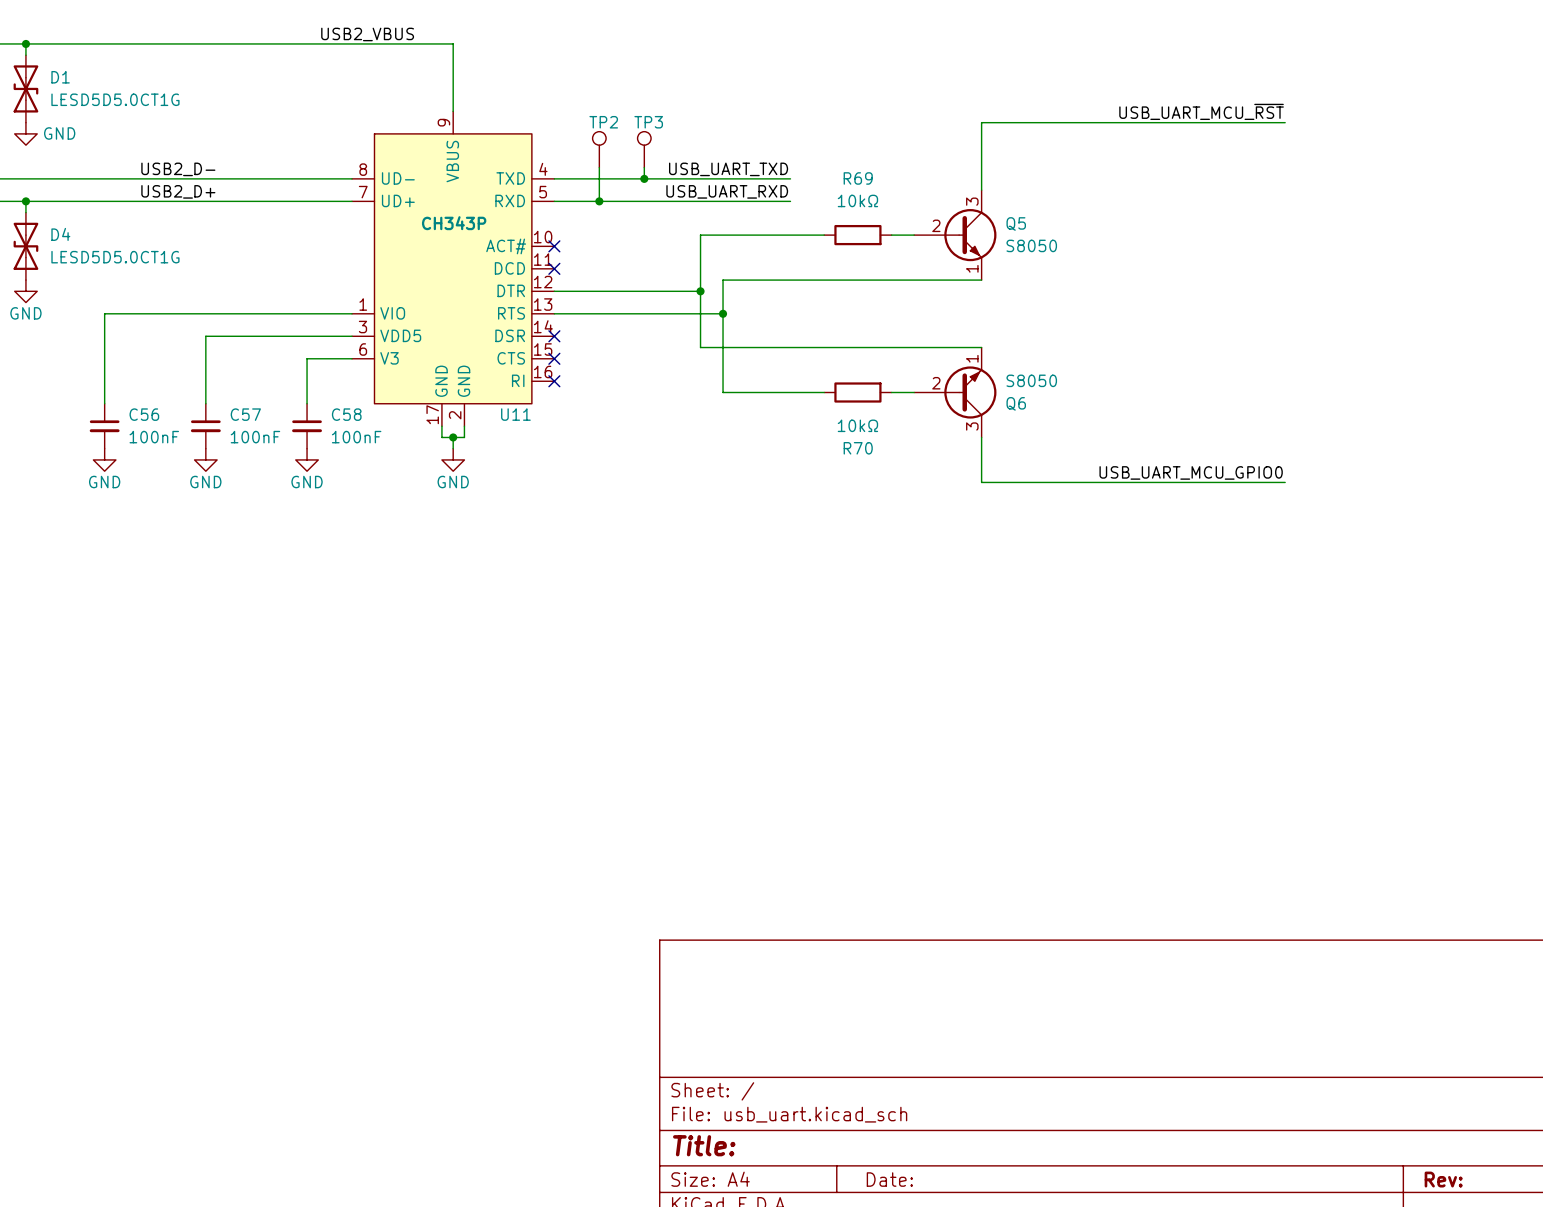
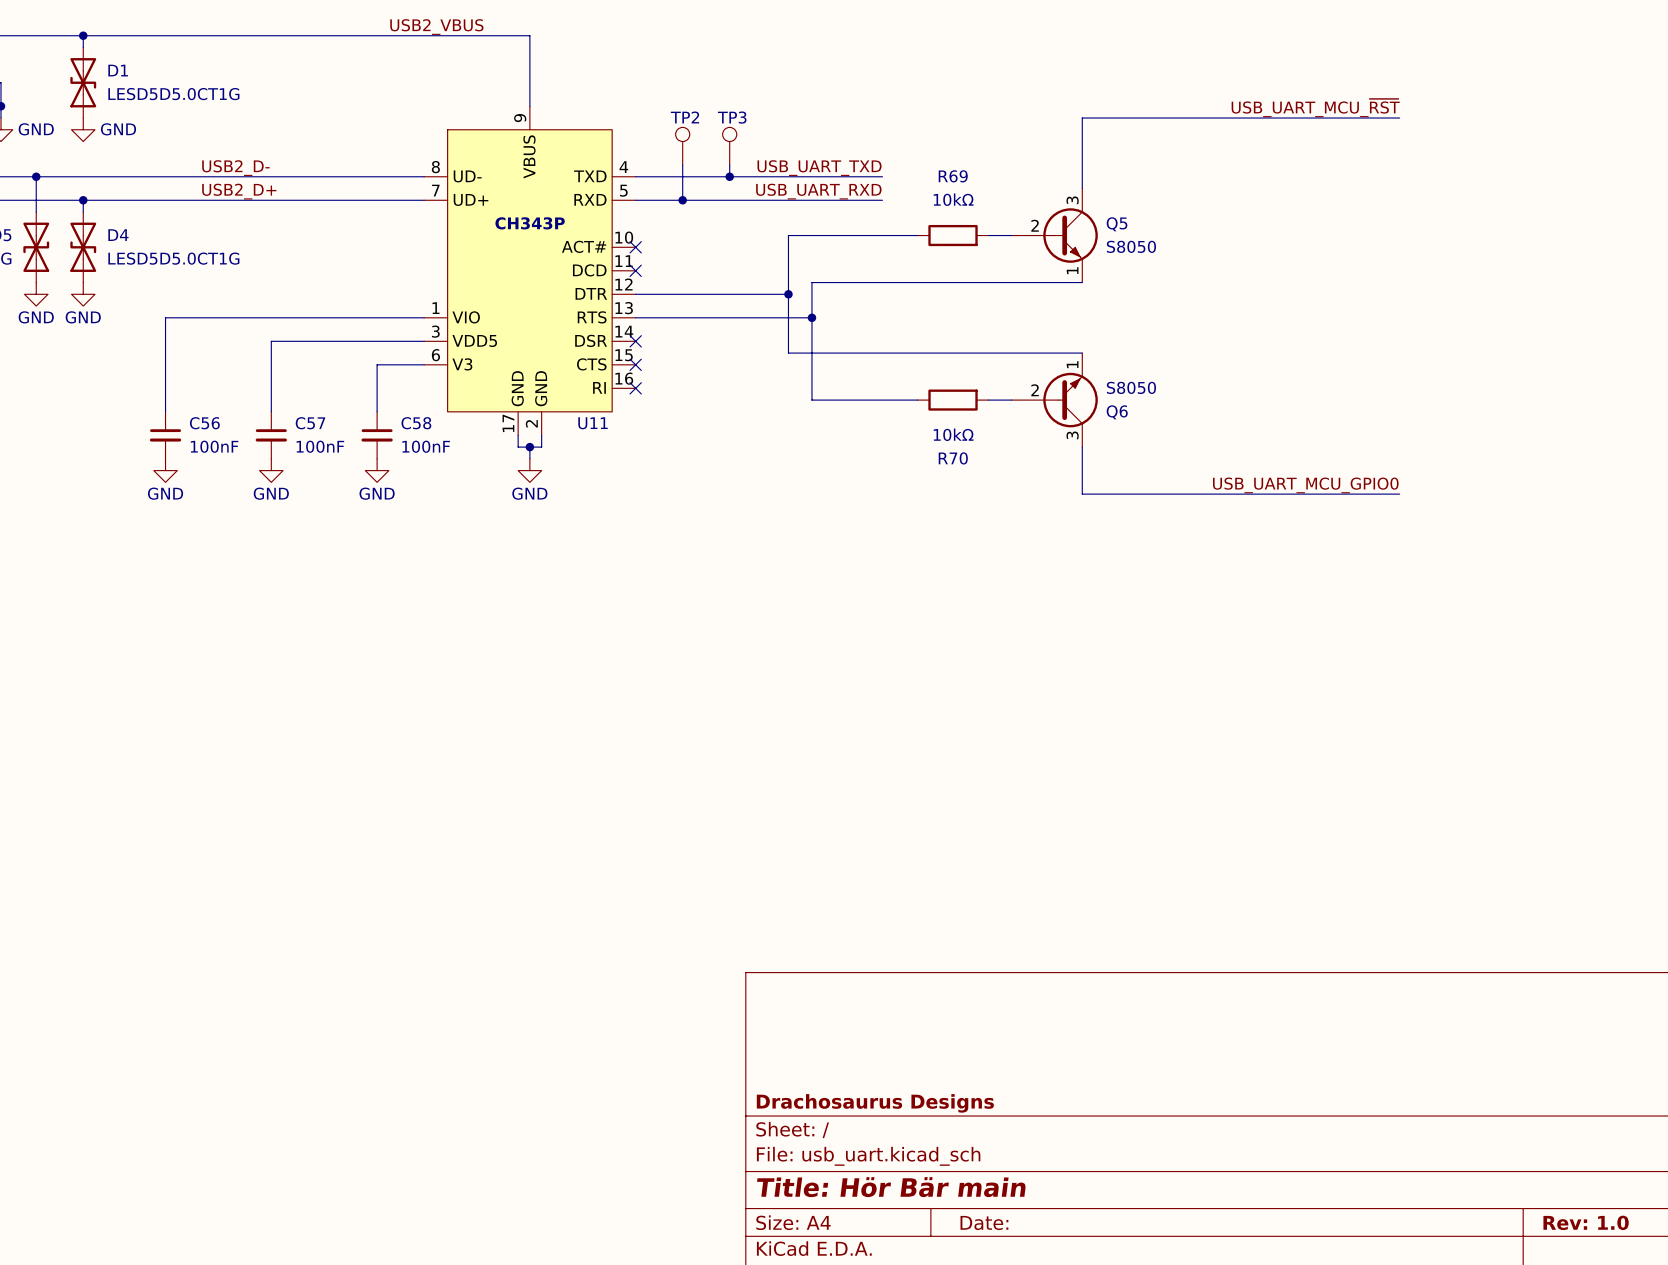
title block: none -> Drachosaurus Designs (875, 1103)
title block: Title: (704, 1145) -> Title: Hör Bär main (891, 1187)
title block: Rev: (1443, 1179) -> Rev: 1.0 (1586, 1222)

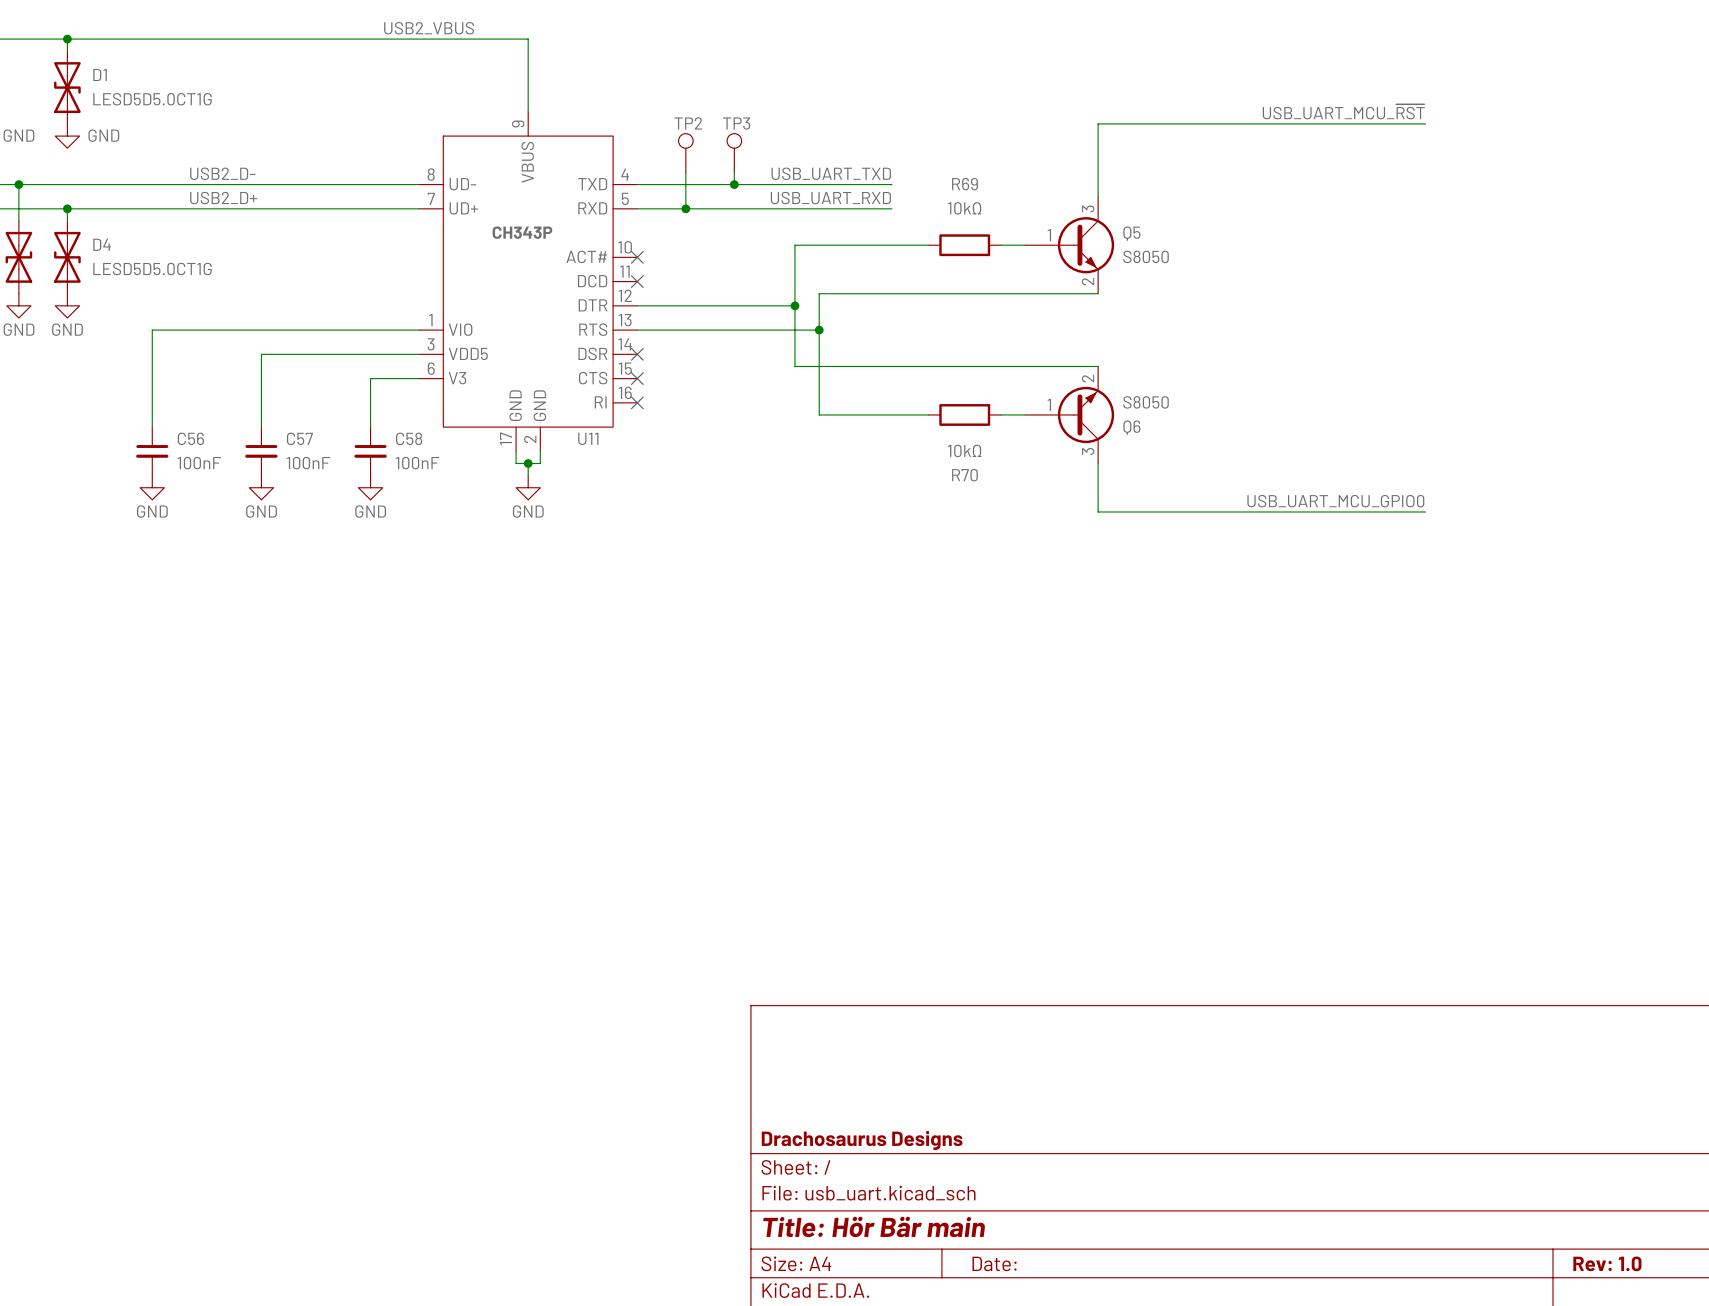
Q5 pin number: 2 (1035, 225) -> 1 (1049, 235)
Q5 pin number: 1 (1072, 270) -> 2 (1088, 281)
Q6 pin number: 1 (1072, 364) -> 2 (1088, 378)
Q6 pin number: 2 (1035, 390) -> 1 (1049, 404)

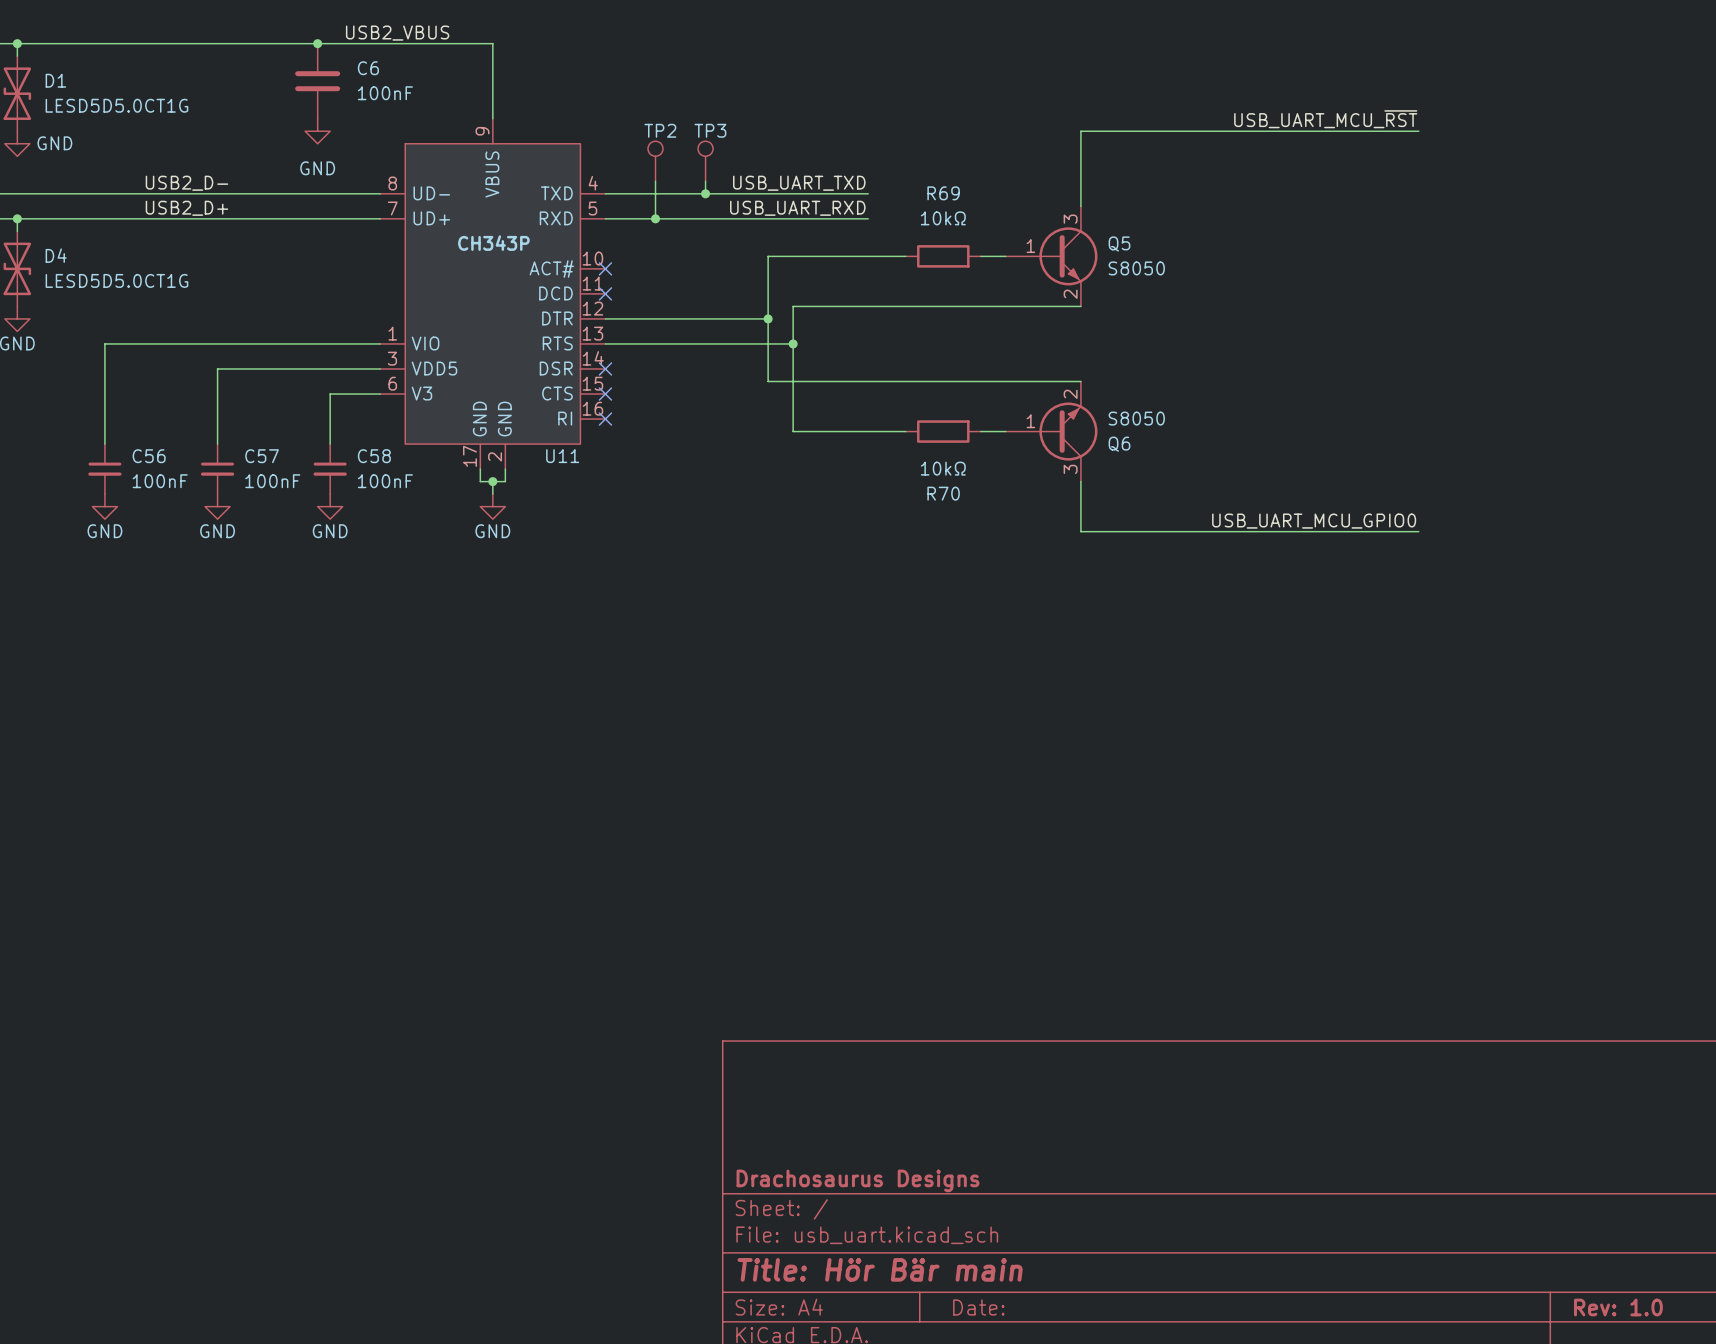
junction: none -> (317, 43)
C6: none -> 100nF (317, 81)
power symbol: none -> GND (317, 131)

